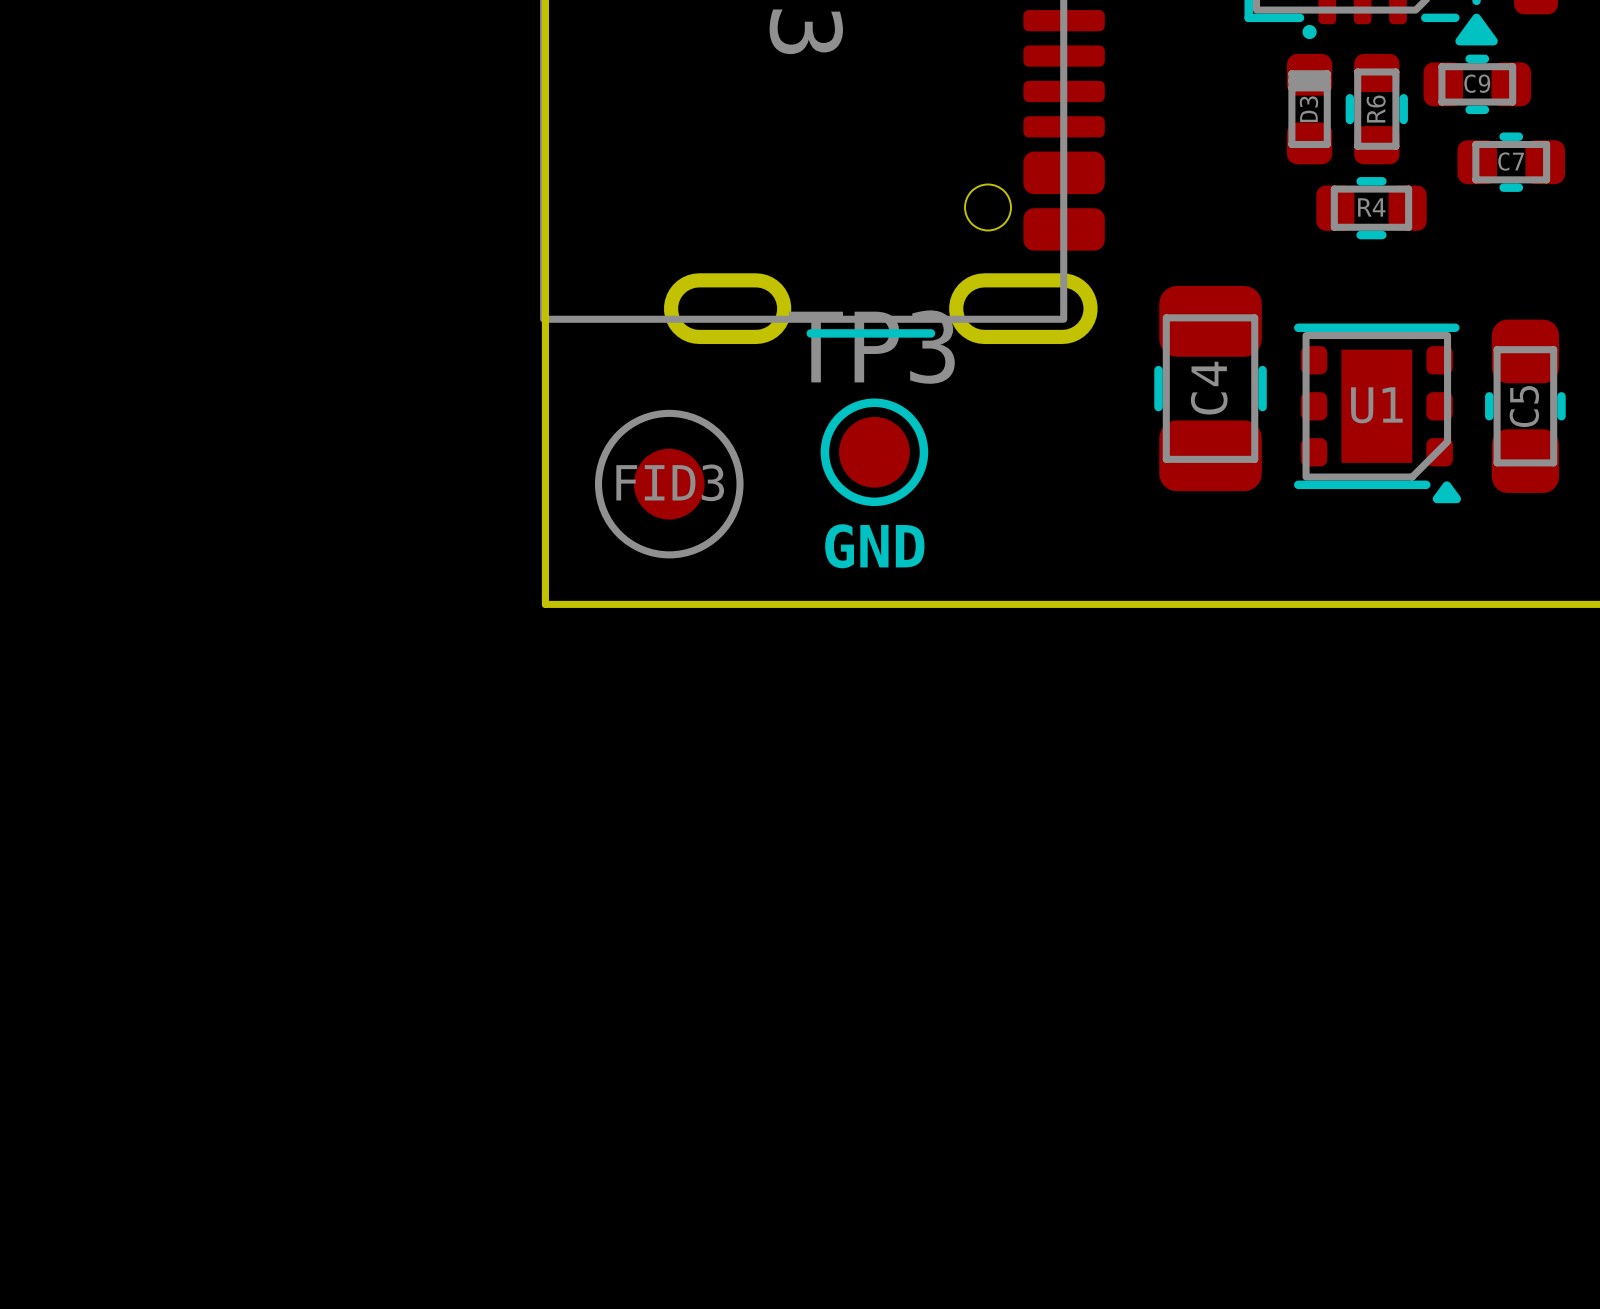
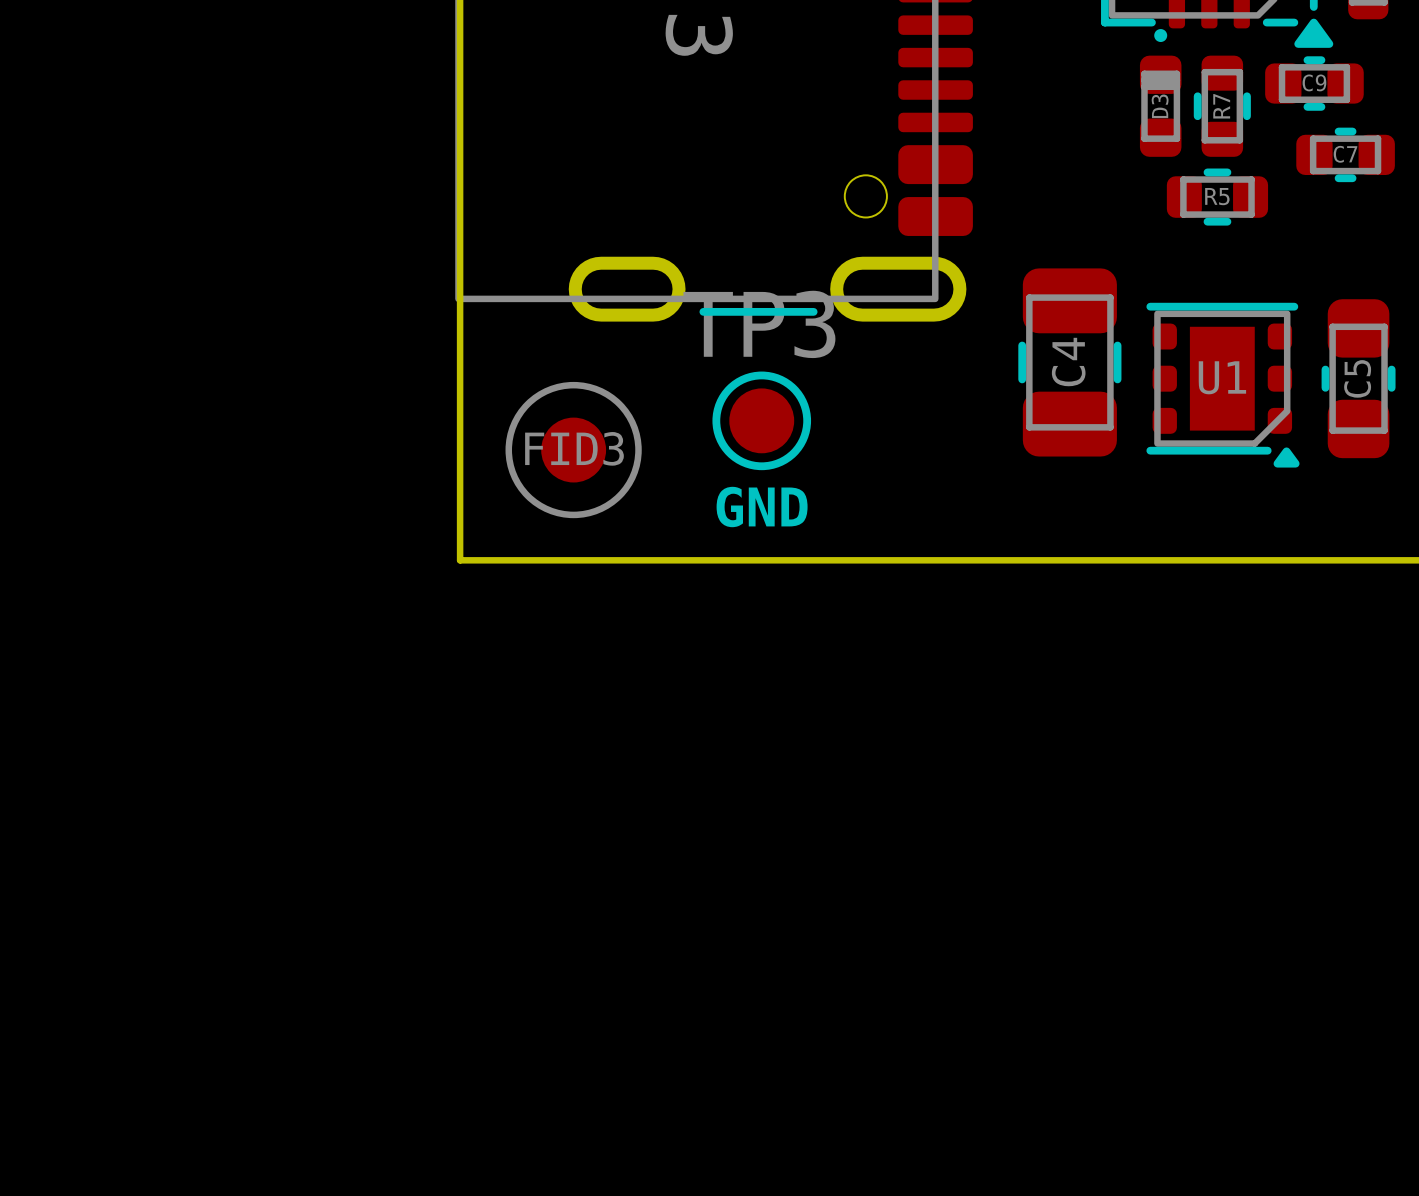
R6 name: R6 (1376, 109) -> R7 (1221, 106)
R4 name: R4 (1371, 207) -> R5 (1217, 196)

